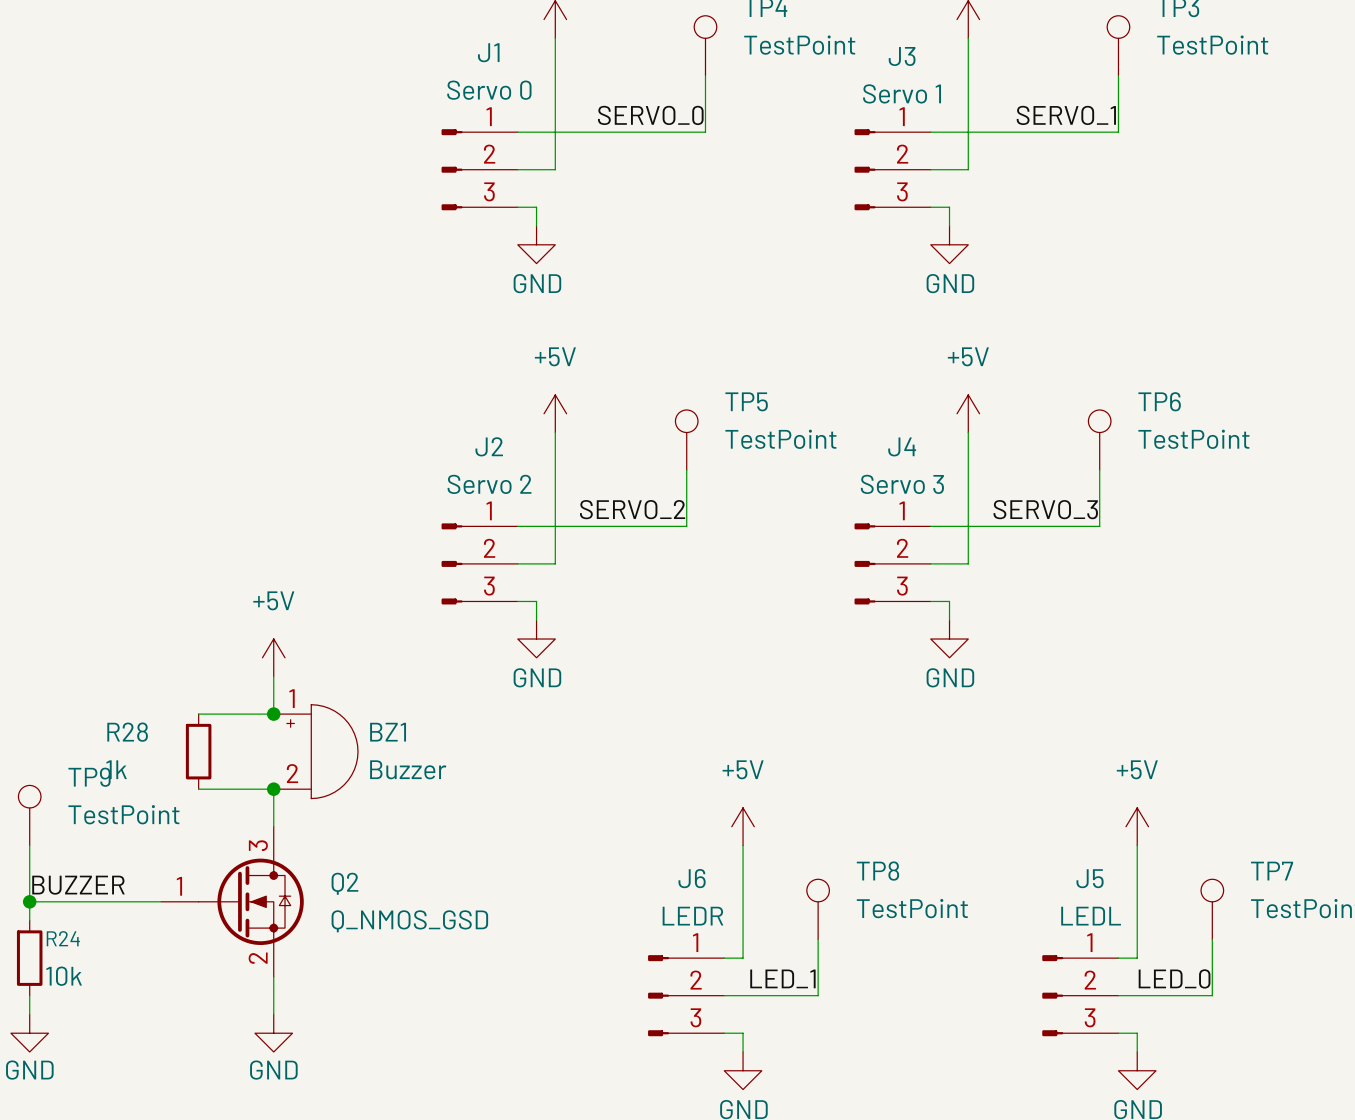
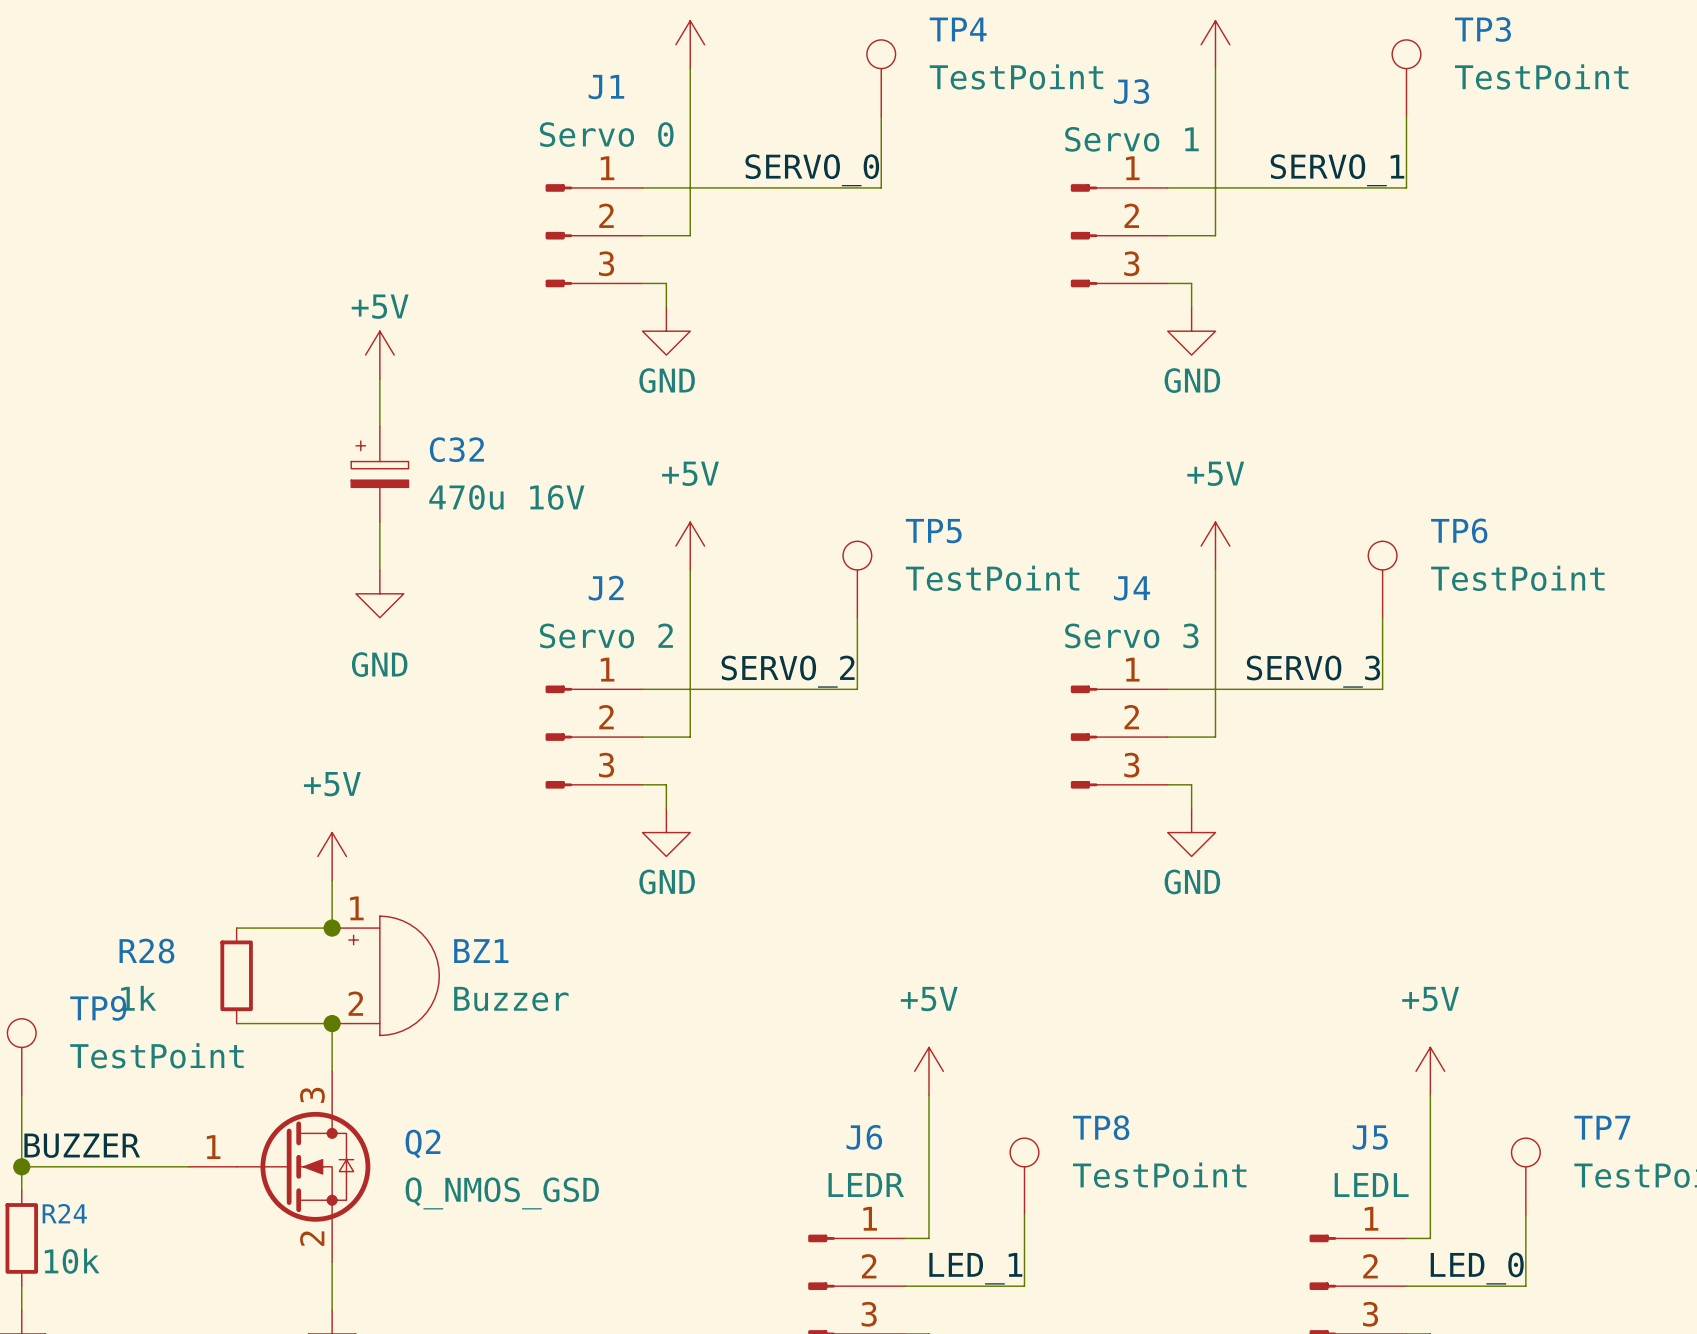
power symbol: none -> +5V (379, 355)
wire: none -> (379, 378) (379, 426)
C32: none -> 470u 16V (379, 474)
wire: none -> (379, 522) (379, 569)
power symbol: none -> GND (379, 593)

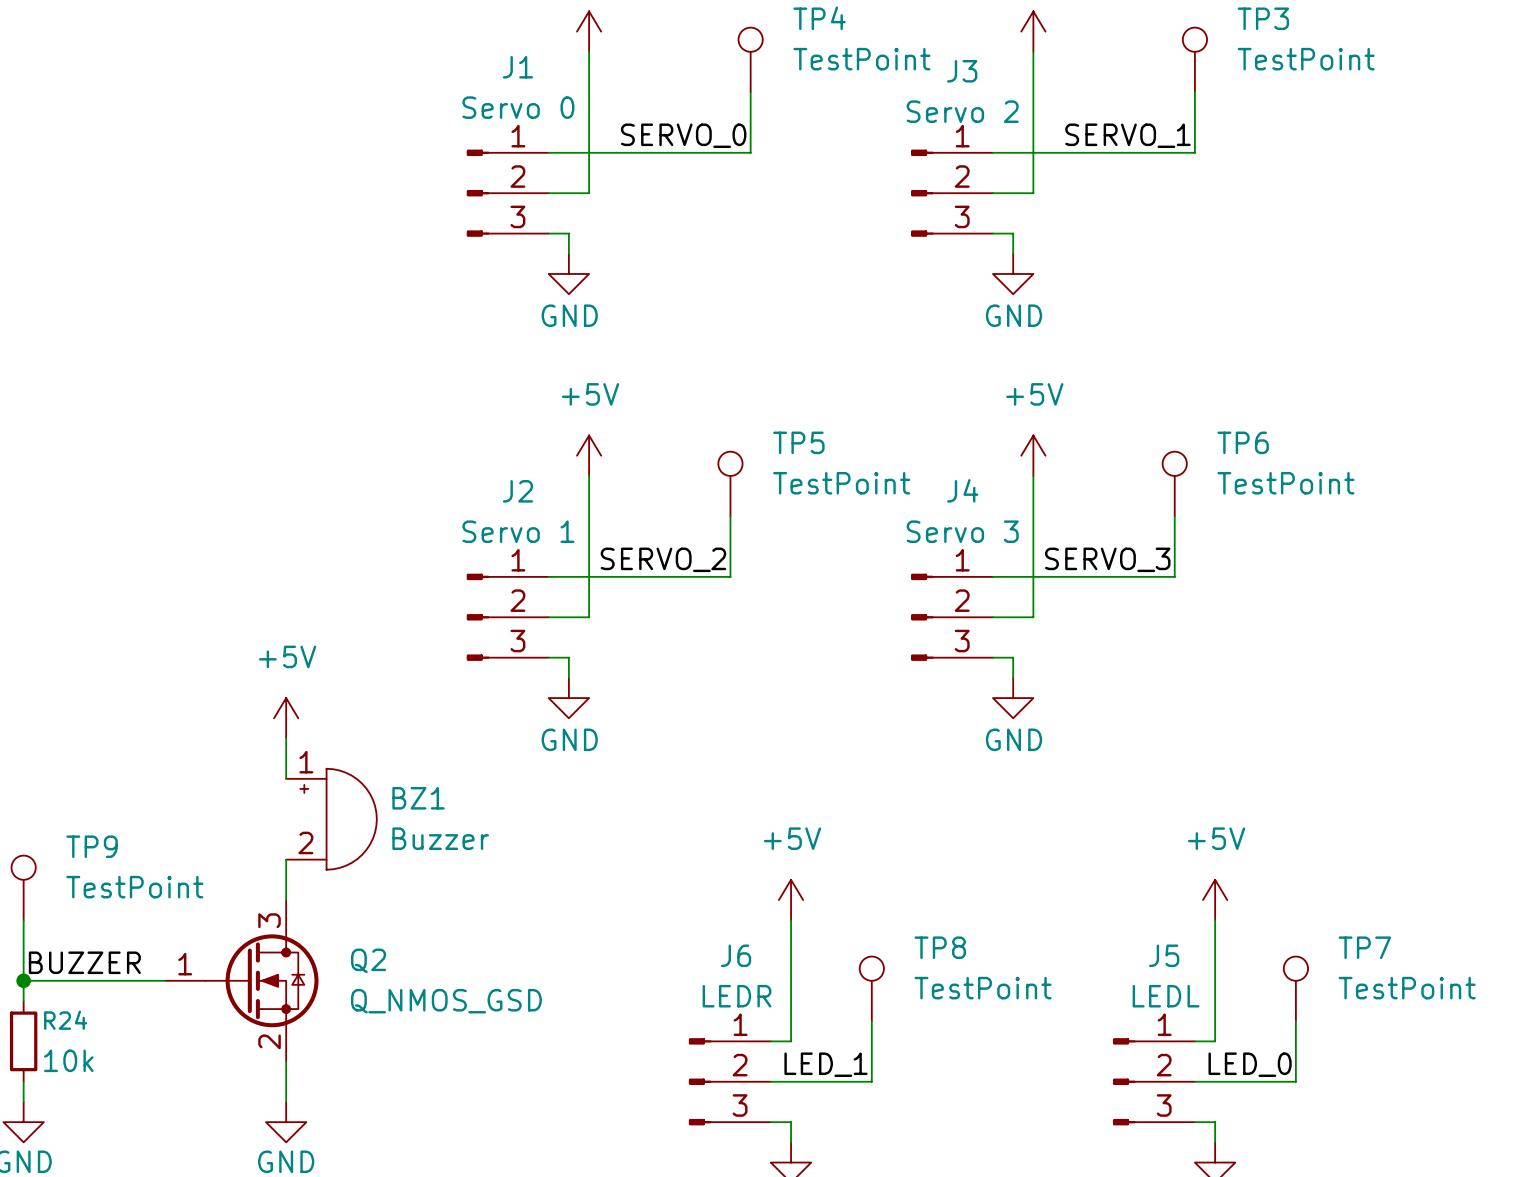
J3 value: Servo 1 (1131, 139) -> Servo 2 (962, 111)
power symbol: +5V (379, 355) -> none
wire: (379, 378) (379, 426) -> none
C32: 470u 16V (379, 474) -> none
wire: (379, 522) (379, 569) -> none
power symbol: GND (379, 593) -> none
J2 value: Servo 2 (606, 635) -> Servo 1 (518, 531)
wire: (236, 928) (332, 928) -> none
junction: (332, 928) -> none
R28: 1k (236, 975) -> none
wire: (236, 1023) (332, 1023) -> none
junction: (332, 1023) -> none

